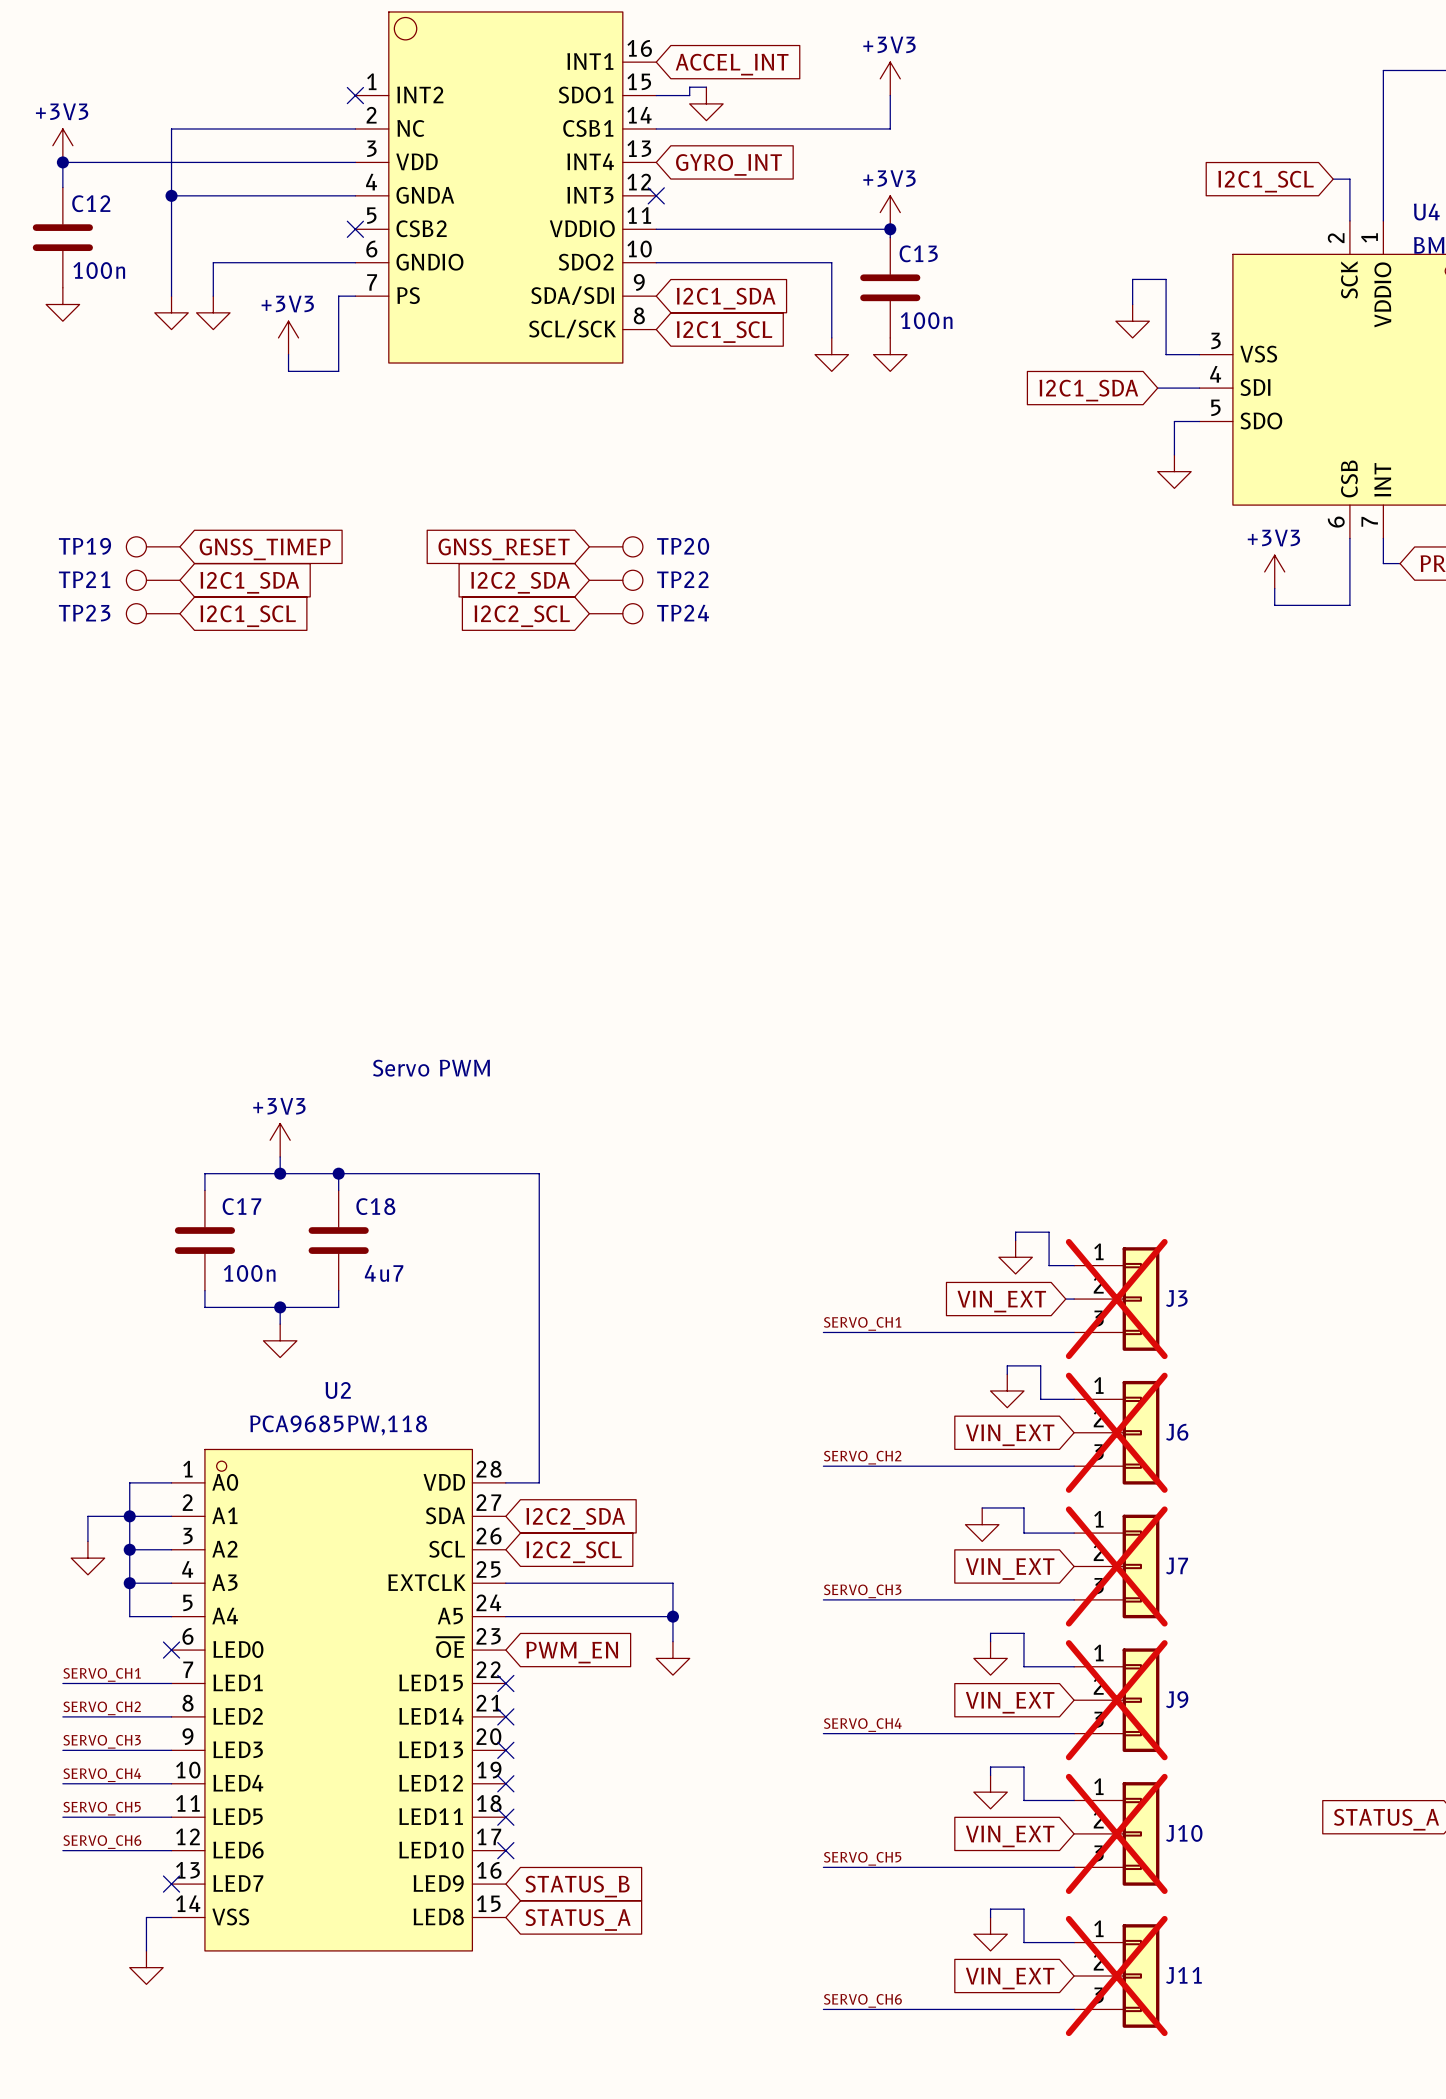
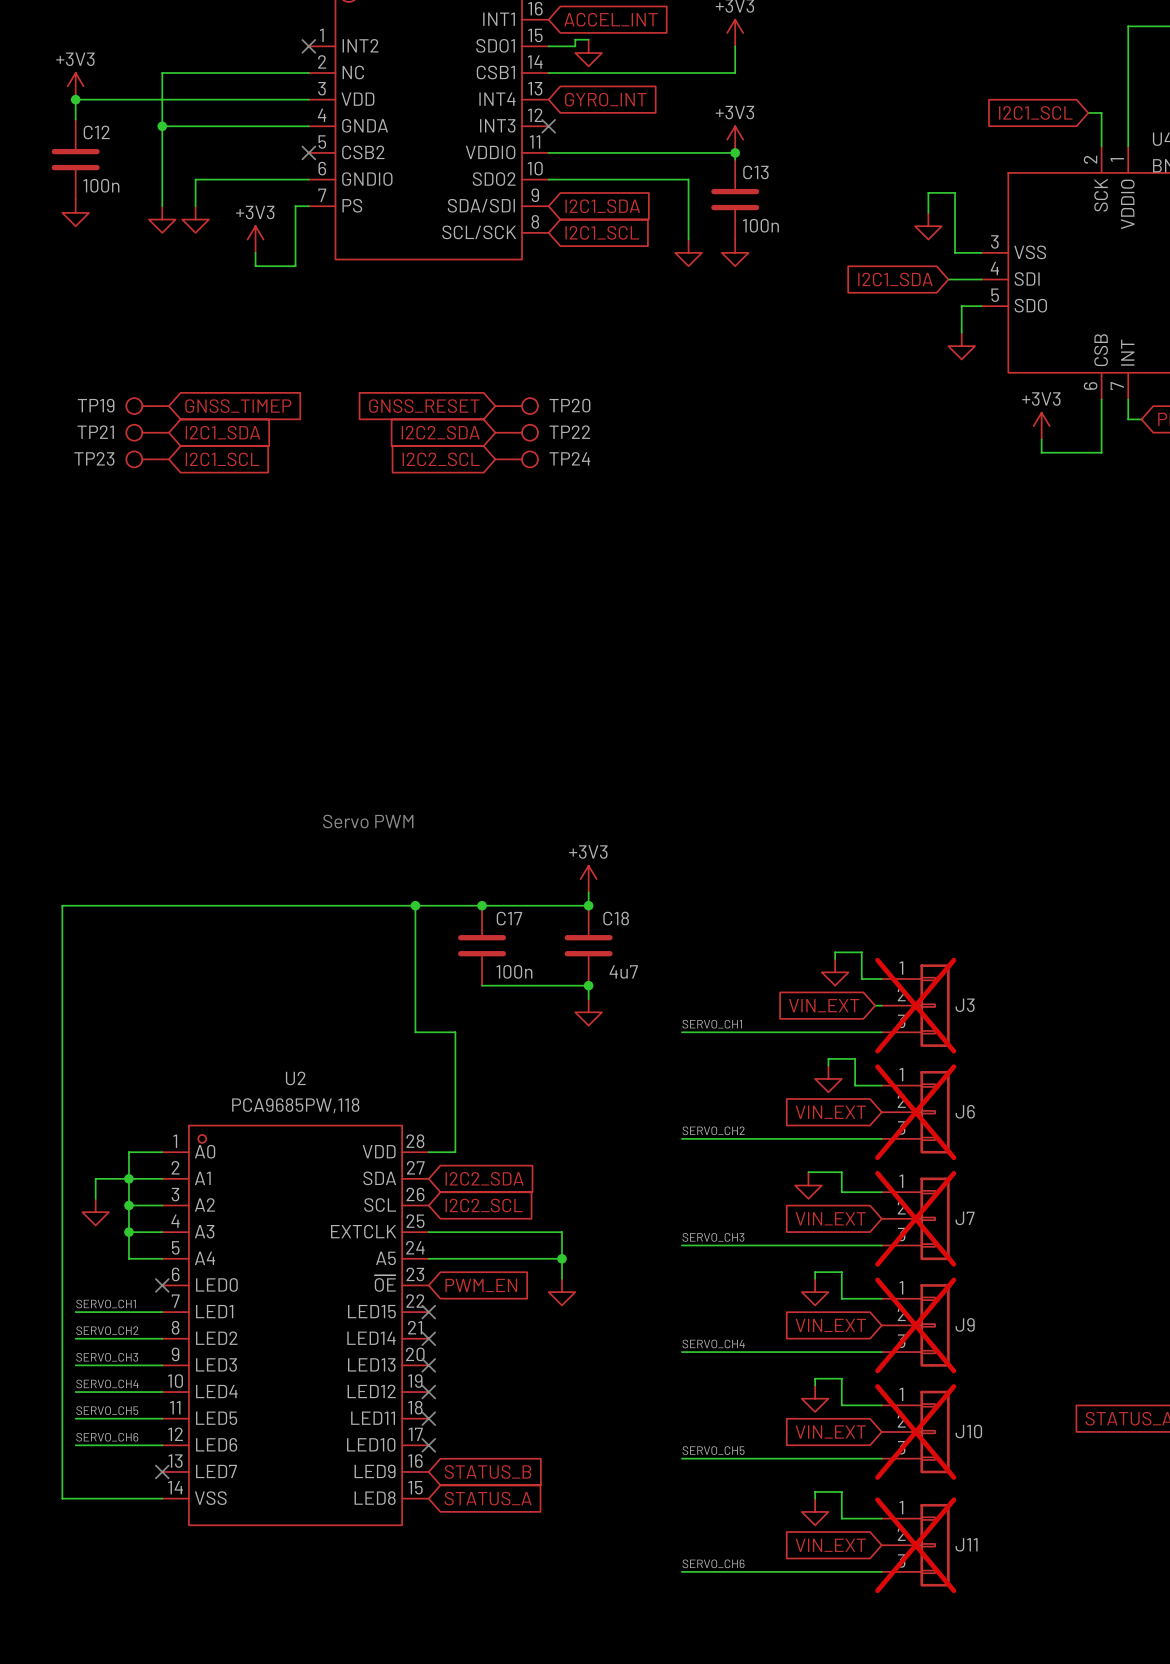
power symbol: +3V3 (280, 1140) -> none
power symbol: none -> +3V3 (588, 879)
wire: (280, 1156) (280, 1173) -> none
wire: none -> (588, 892) (588, 905) (455, 905)
wire: (204, 1173) (204, 1190) -> (188, 905) (62, 905) (62, 1498) (142, 1498)
junction: (280, 1173) -> none
wire: (338, 1173) (338, 1190) -> none
junction: (338, 1173) -> none
junction: none -> (415, 905)
wire: (539, 1173) (539, 1332) -> (415, 905) (415, 1032) (455, 1032)
junction: none -> (482, 905)
junction: none -> (588, 905)
C17 position: (204, 1240) -> (482, 945)
C18 position: (338, 1240) -> (588, 945)
wire: none -> (482, 985) (588, 985) (588, 998)
junction: none -> (588, 985)
wire: (204, 1290) (204, 1307) (338, 1307) (338, 1290) -> none
wire: (280, 1307) (280, 1324) -> none
junction: (280, 1307) -> none
power symbol: none -> (588, 1012)
power symbol: (280, 1340) -> none
wire: (146, 1917) (146, 1950) -> none
power symbol: (146, 1967) -> none

